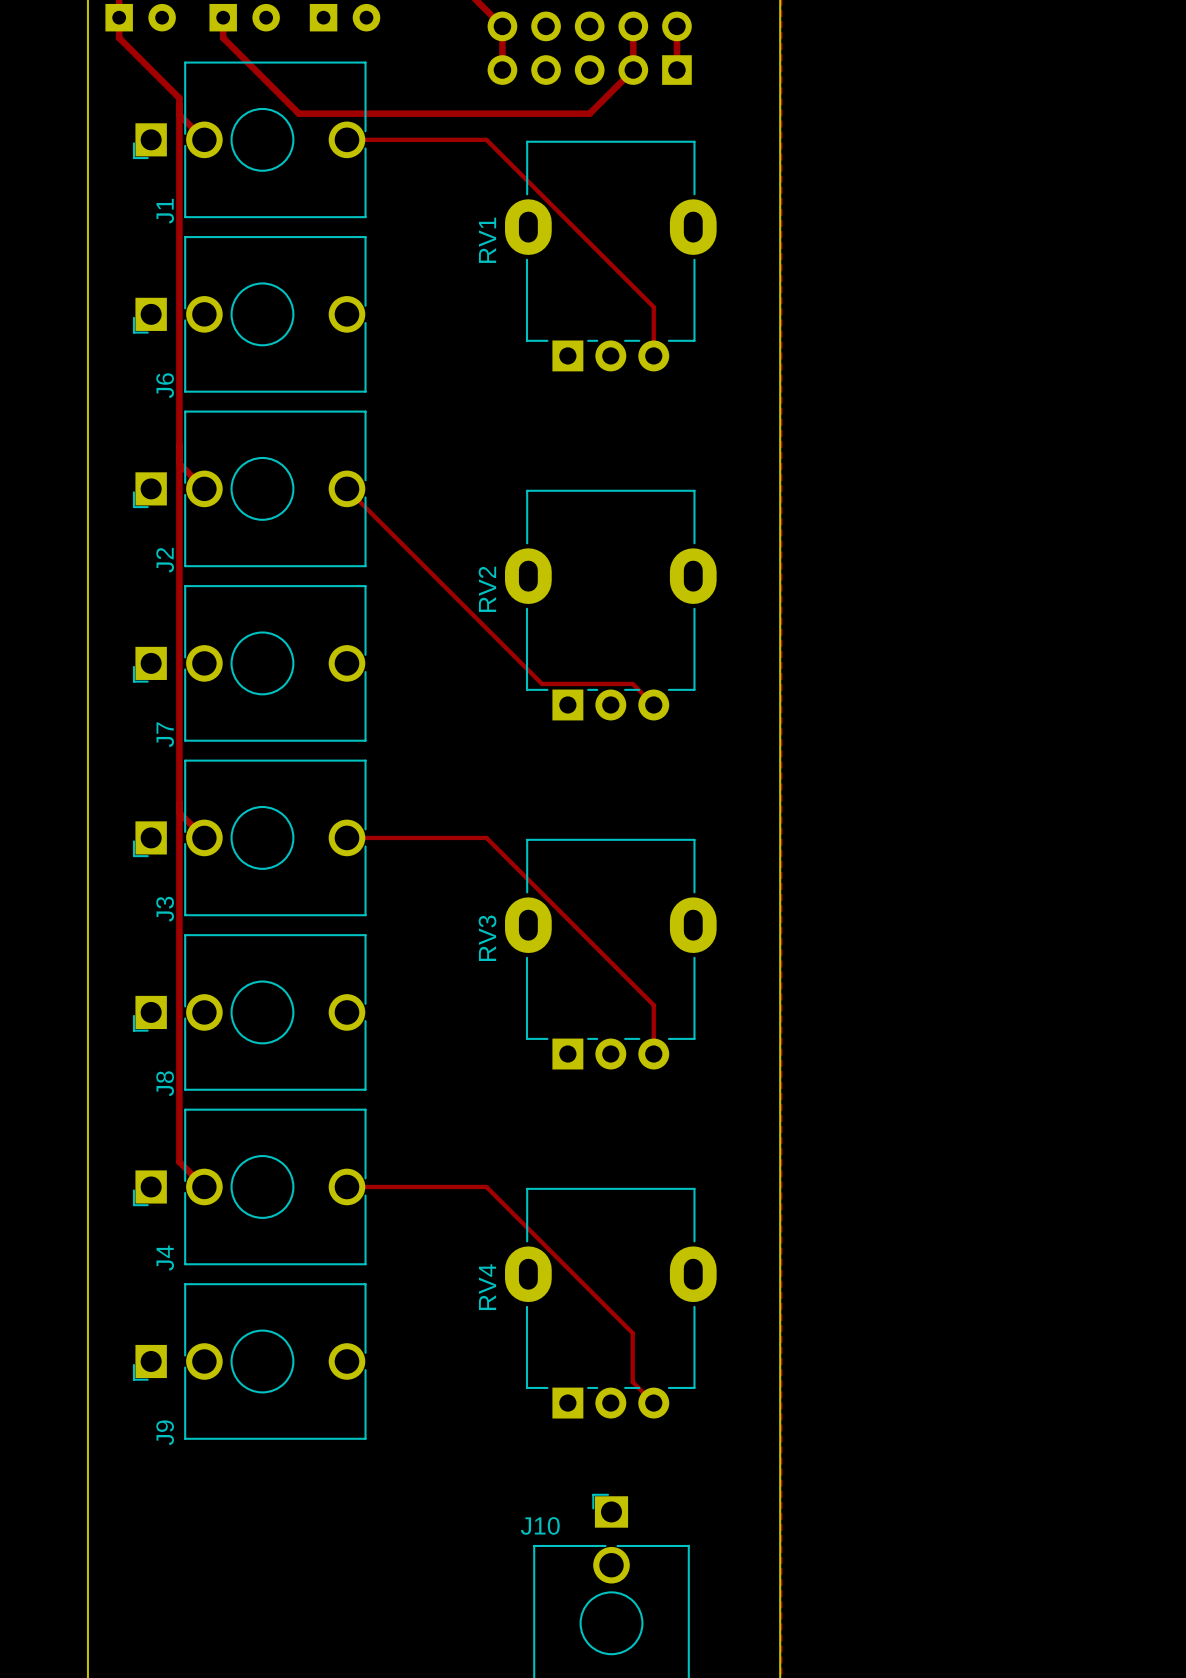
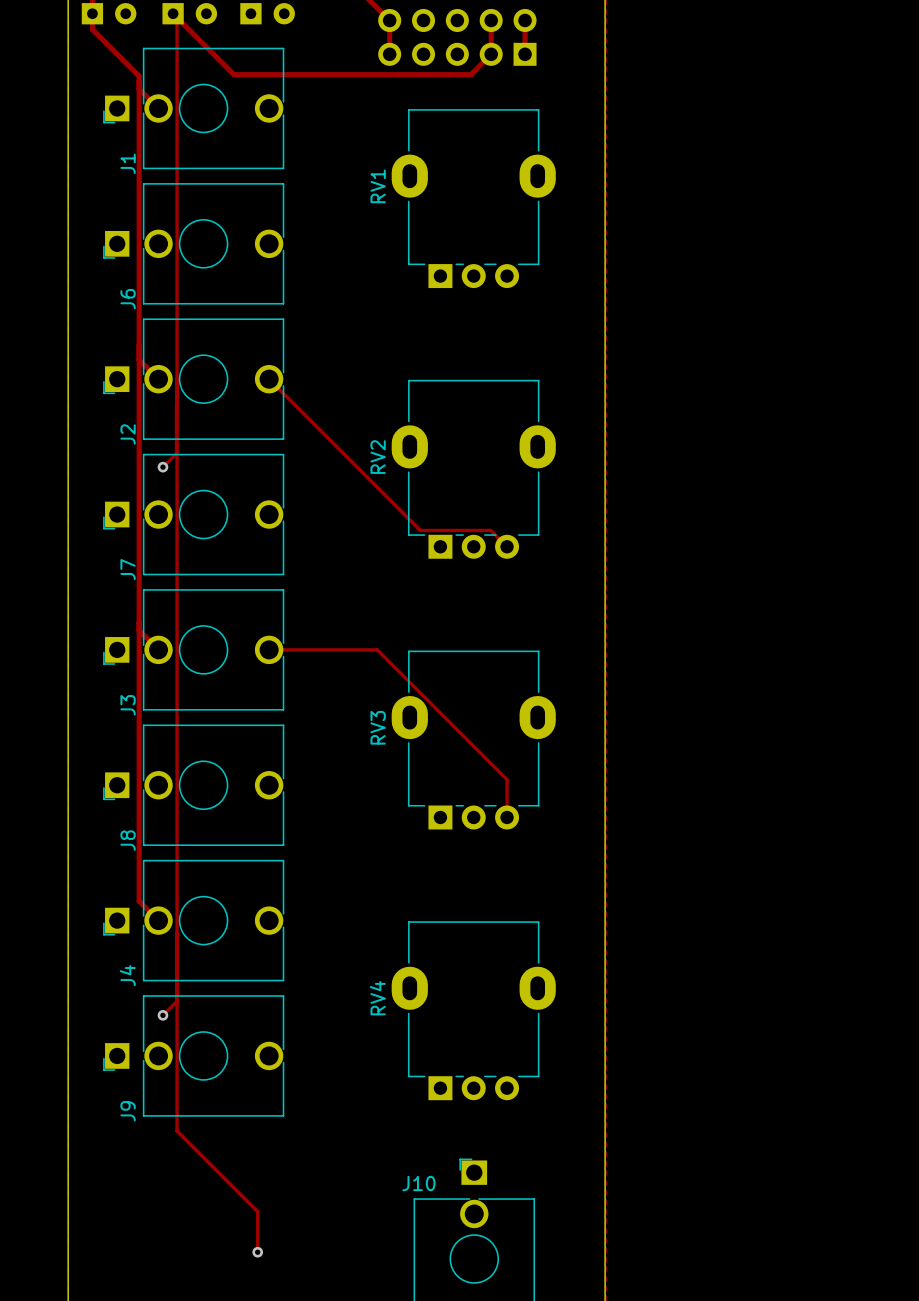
track: (223, 17) (223, 37) (298, 113) (589, 113) (607, 96) -> (257, 1252) (257, 1211) (177, 1130) (177, 17) (173, 13) (234, 74) (470, 74)
track: (346, 139) (486, 139) (653, 307) (653, 355) -> none
track: none -> (177, 405) (176, 453) (162, 467)
via: none -> (162, 467)
track: (346, 1186) (486, 1186) (632, 1333) (632, 1382) (653, 1403) -> none
track: none -> (177, 1001) (162, 1015)
via: none -> (162, 1015)
via: none -> (257, 1252)

